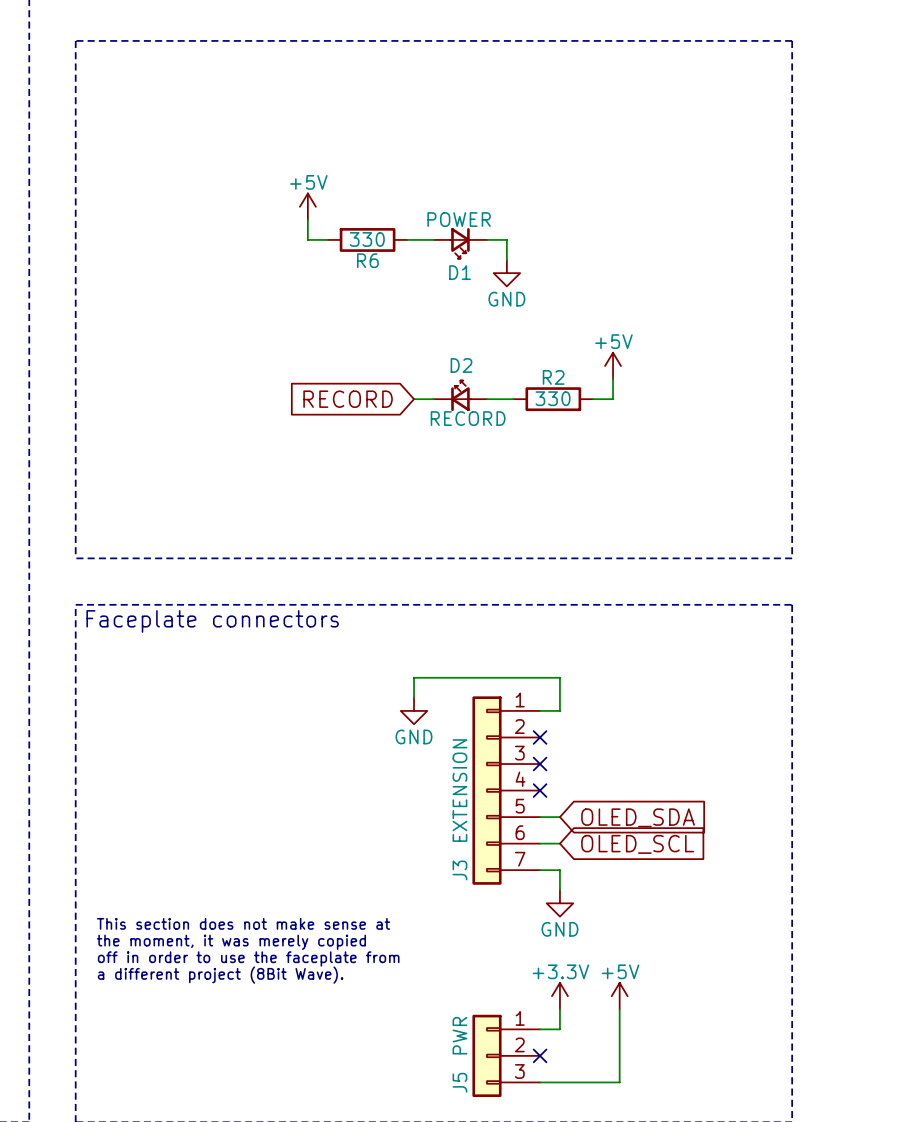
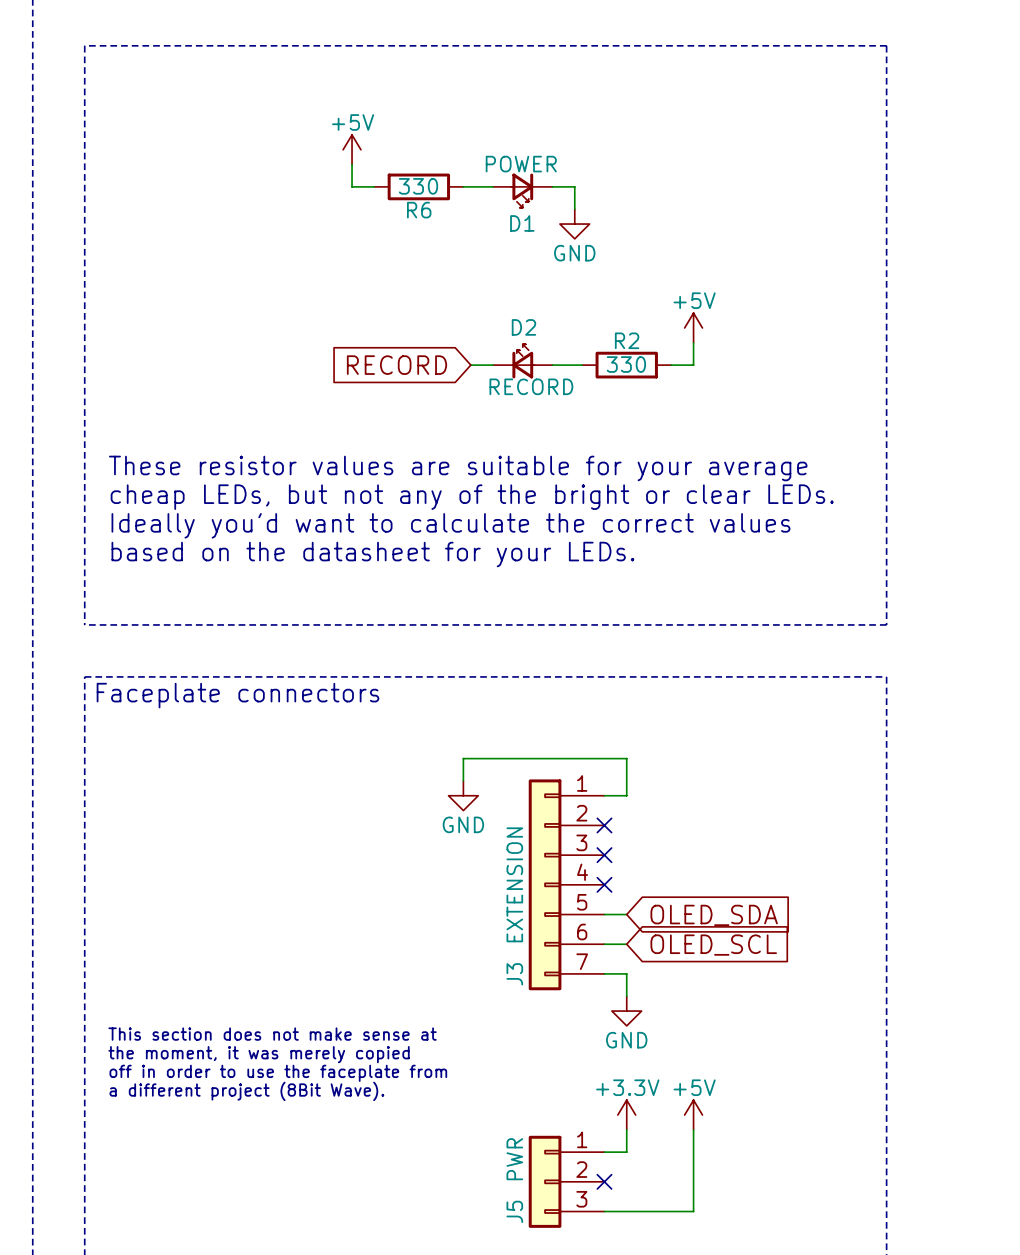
power symbol position: +5V (307, 206) -> +5V (352, 149)
wire: (307, 220) (307, 239) (327, 239) -> (352, 164) (352, 186) (374, 186)
R6 position: (367, 239) -> (418, 186)
wire: (407, 239) (433, 239) -> (463, 186) (493, 186)
wire: (486, 239) (506, 239) (506, 259) -> (552, 186) (574, 186) (574, 209)
D1 position: (460, 243) -> (522, 190)
power symbol position: GND (506, 273) -> GND (574, 224)
power symbol position: +5V (613, 366) -> +5V (693, 327)
wire: (613, 379) (613, 399) (593, 399) -> (693, 342) (693, 365) (671, 365)
D2 position: (460, 395) -> (522, 361)
global label position: RECORD (348, 399) -> RECORD (396, 365)
wire: (414, 399) (433, 399) -> (470, 365) (493, 365)
wire: (486, 399) (513, 399) -> (552, 365) (582, 365)
R2 position: (553, 399) -> (626, 365)
text: none -> These resistor values are suitable for your average (458, 468)
text: none -> cheap LEDs, but not any of the bright or clear LEDs. (472, 497)
text: none -> Ideally you'd want to calculate the correct values (450, 525)
text: none -> based on the datasheet for your LEDs. (372, 554)

